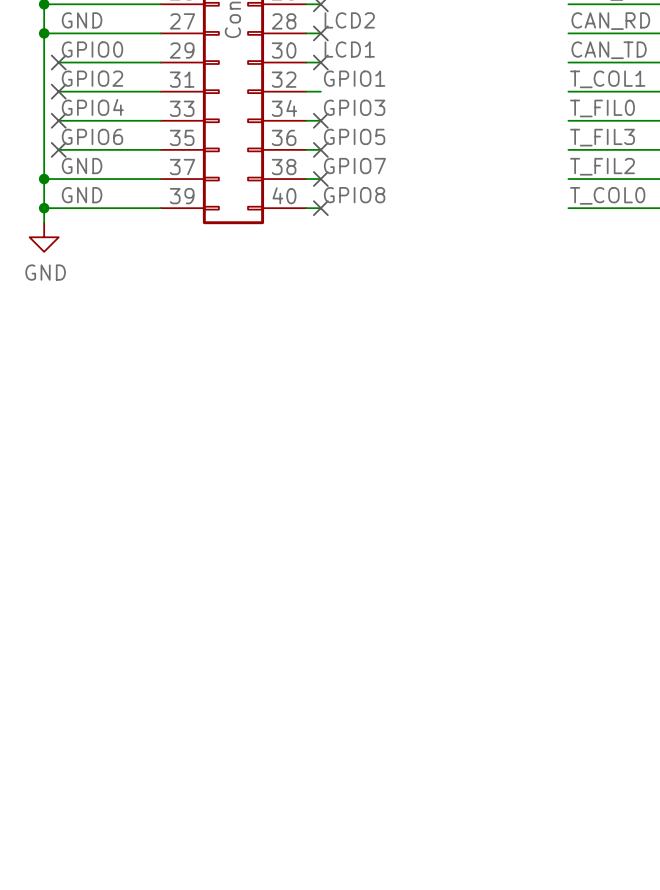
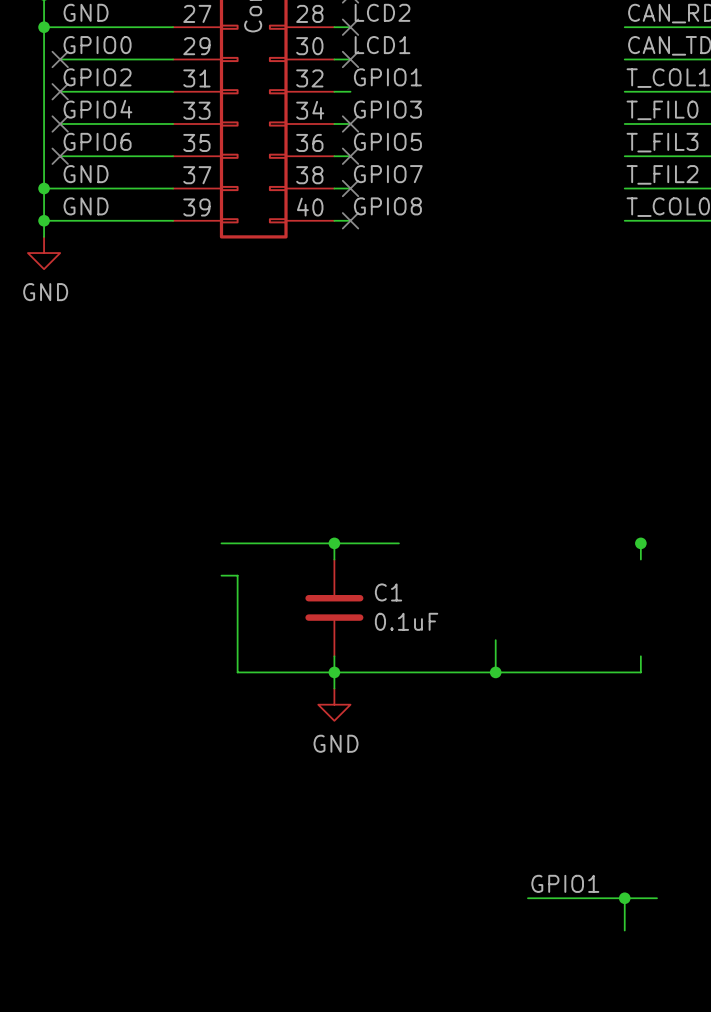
wire: none -> (221, 543) (398, 543)
wire: none -> (334, 543) (334, 559)
junction: none -> (334, 543)
wire: none -> (640, 543) (640, 559)
junction: none -> (640, 543)
wire: none -> (221, 575) (237, 575) (237, 672) (640, 672) (640, 656)
C1: none -> 0.1uF (334, 607)
wire: none -> (495, 640) (495, 672)
wire: none -> (334, 656) (334, 688)
junction: none -> (334, 672)
junction: none -> (495, 672)
power symbol: none -> GND (334, 704)
label: none -> GPIO1 (565, 883)
wire: none -> (527, 898) (657, 898)
wire: none -> (624, 898) (624, 930)
junction: none -> (624, 898)

